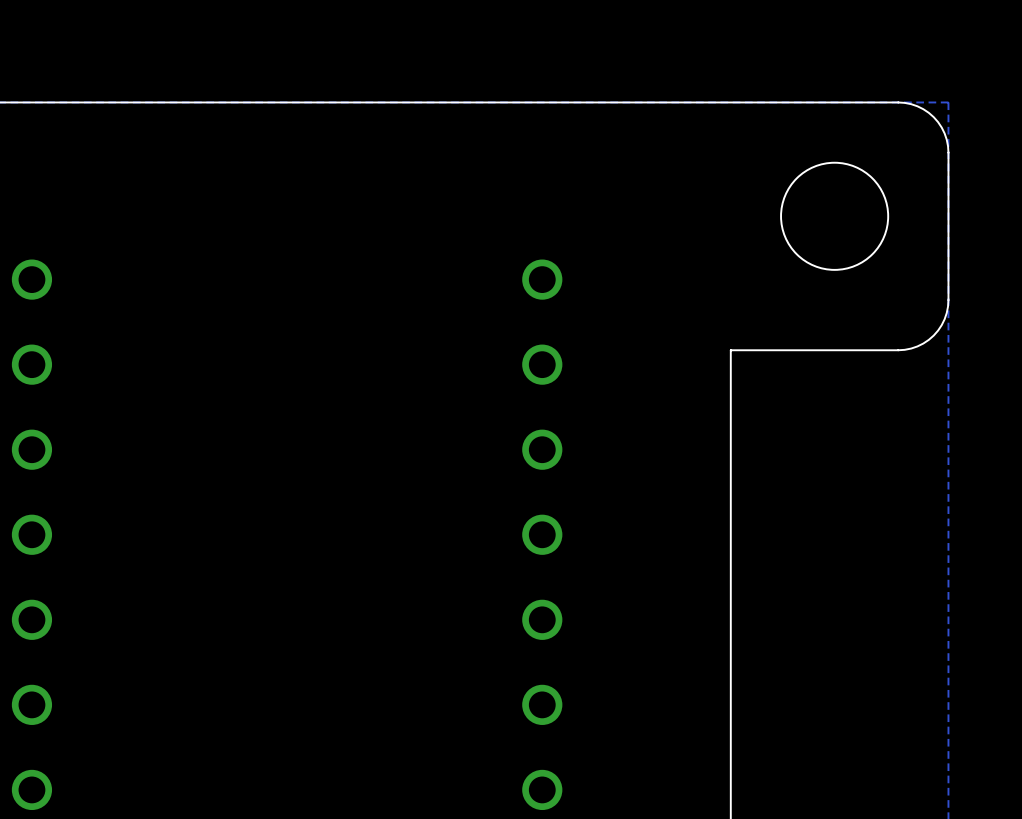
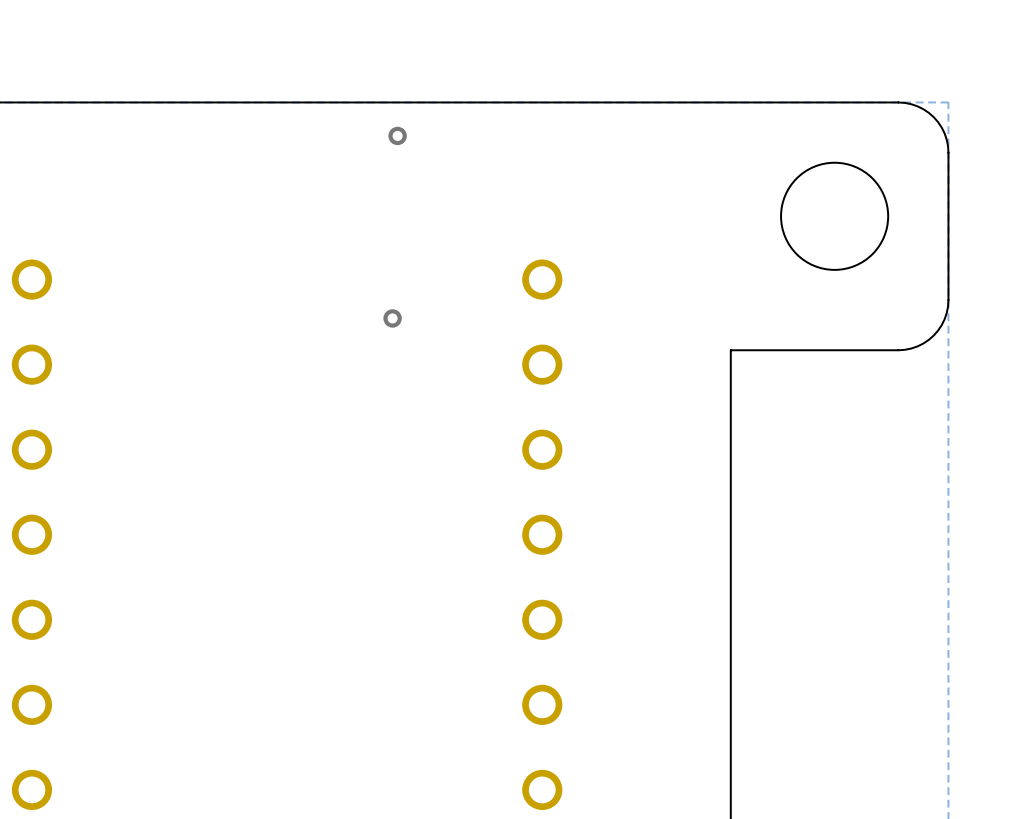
via: none -> (397, 135)
via: none -> (392, 318)

